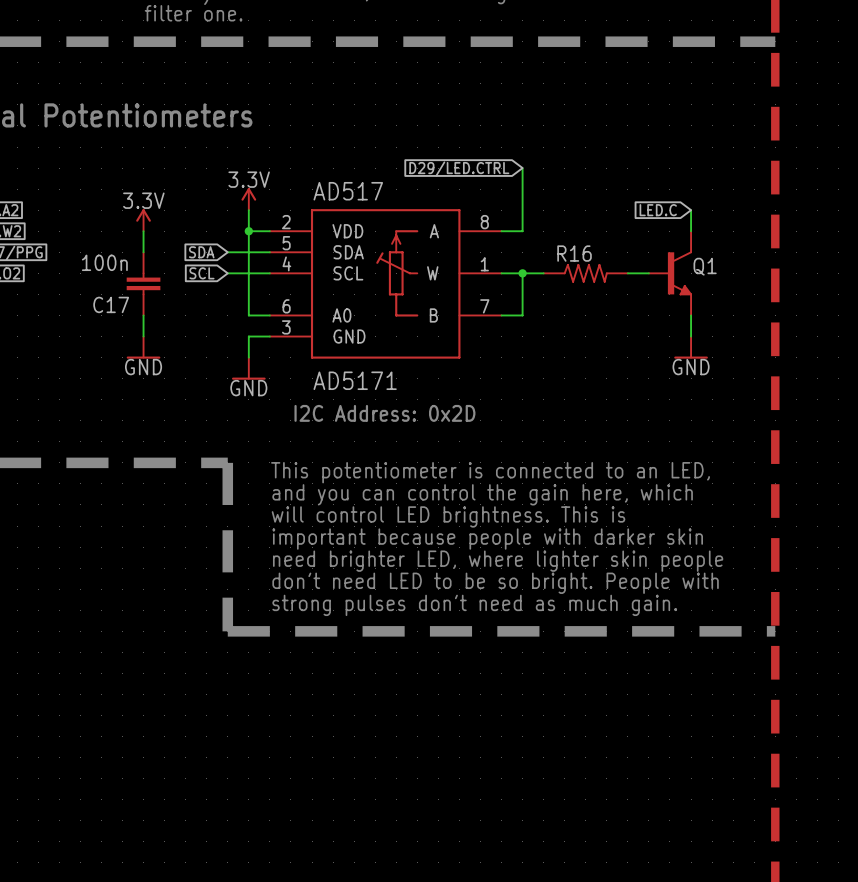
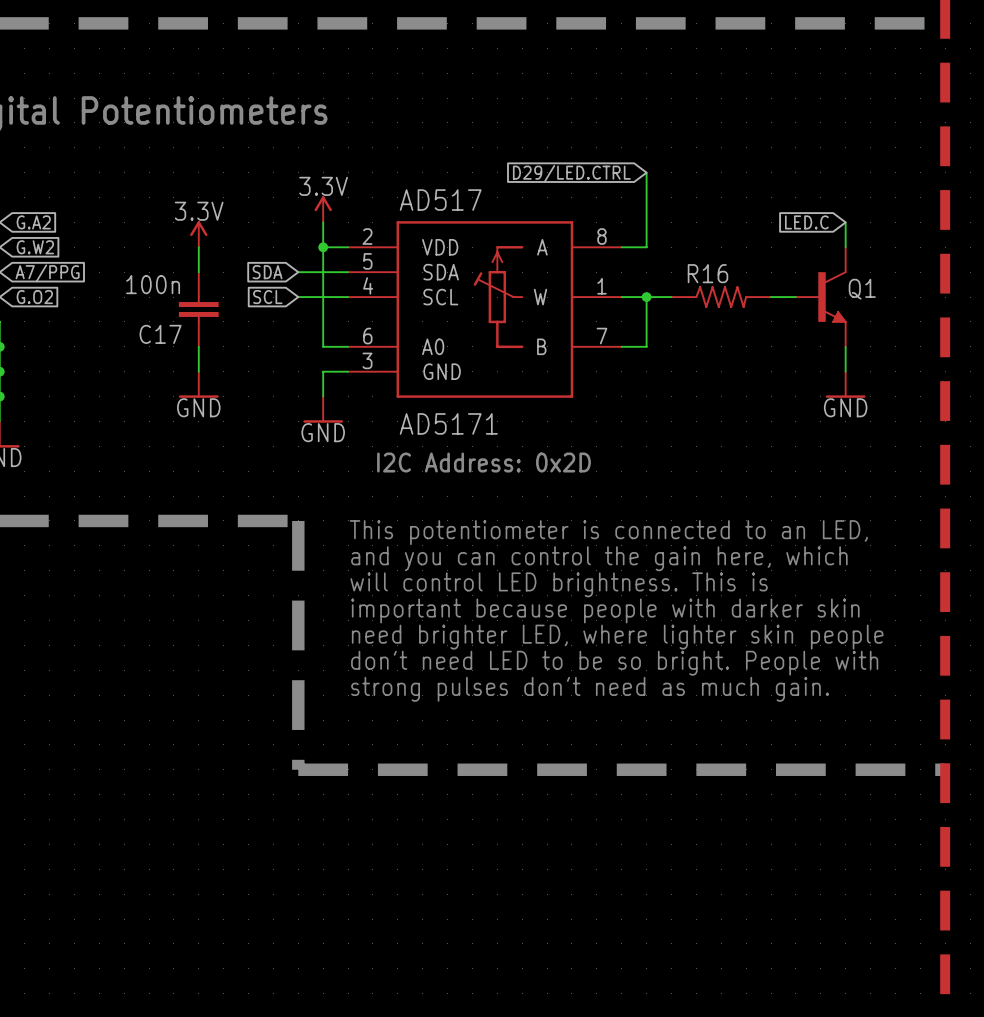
line: (227, 631) (775, 631) -> (298, 720) (298, 769) (945, 769)

